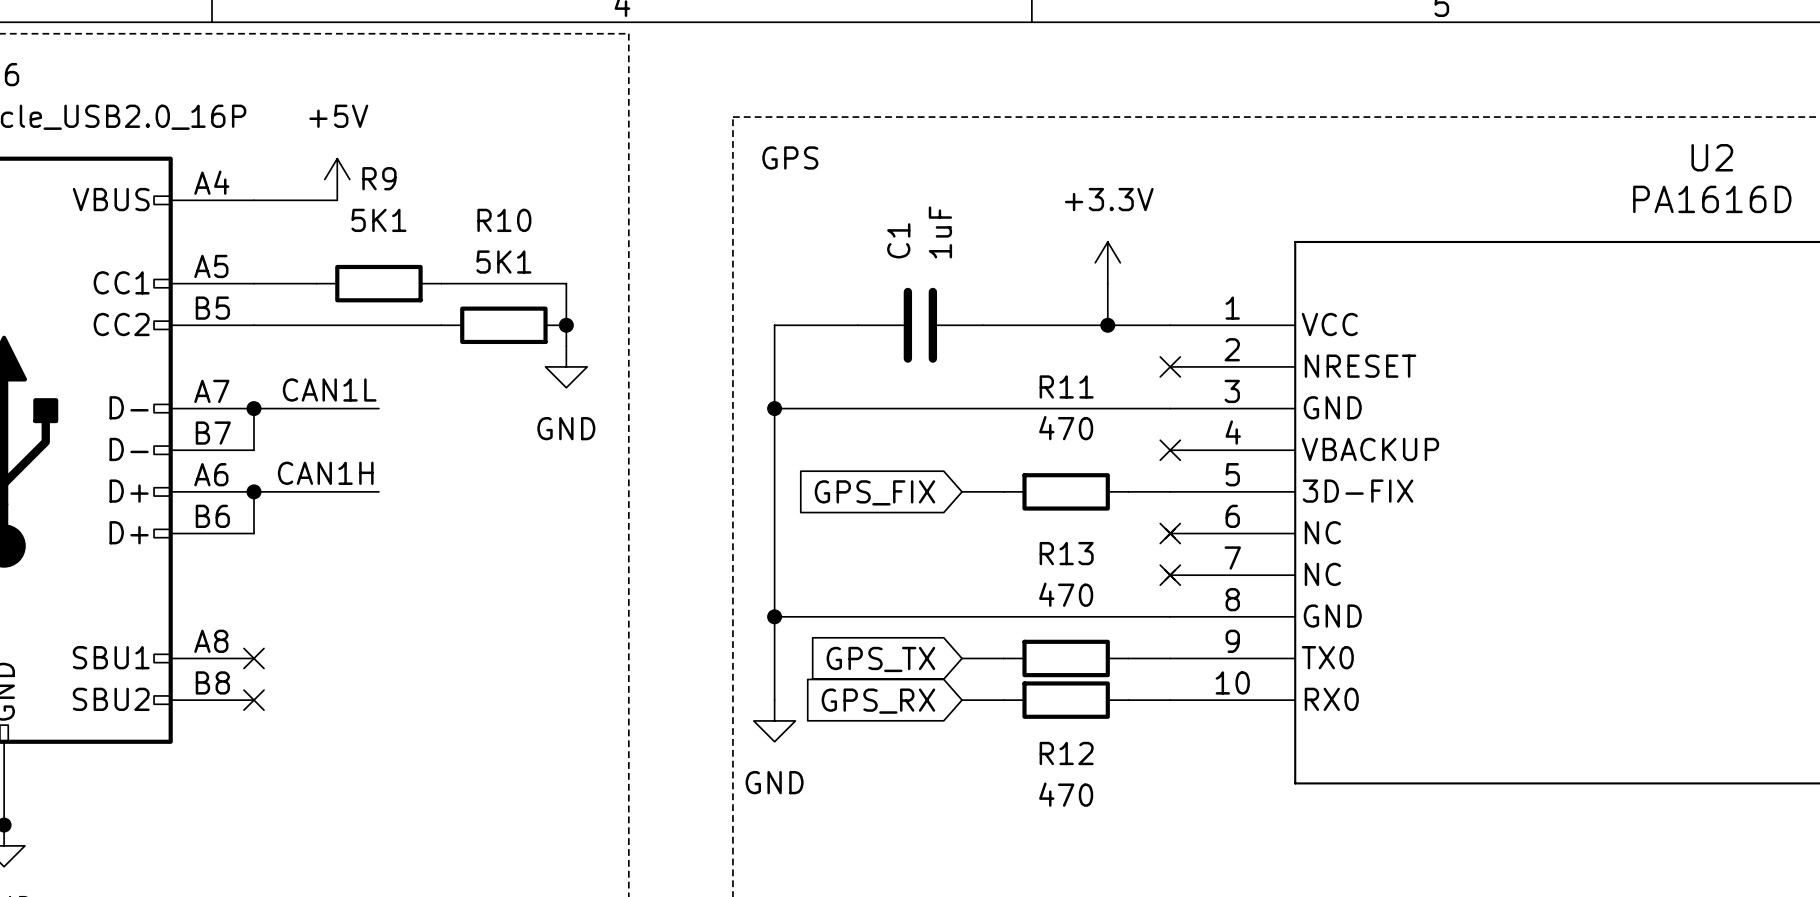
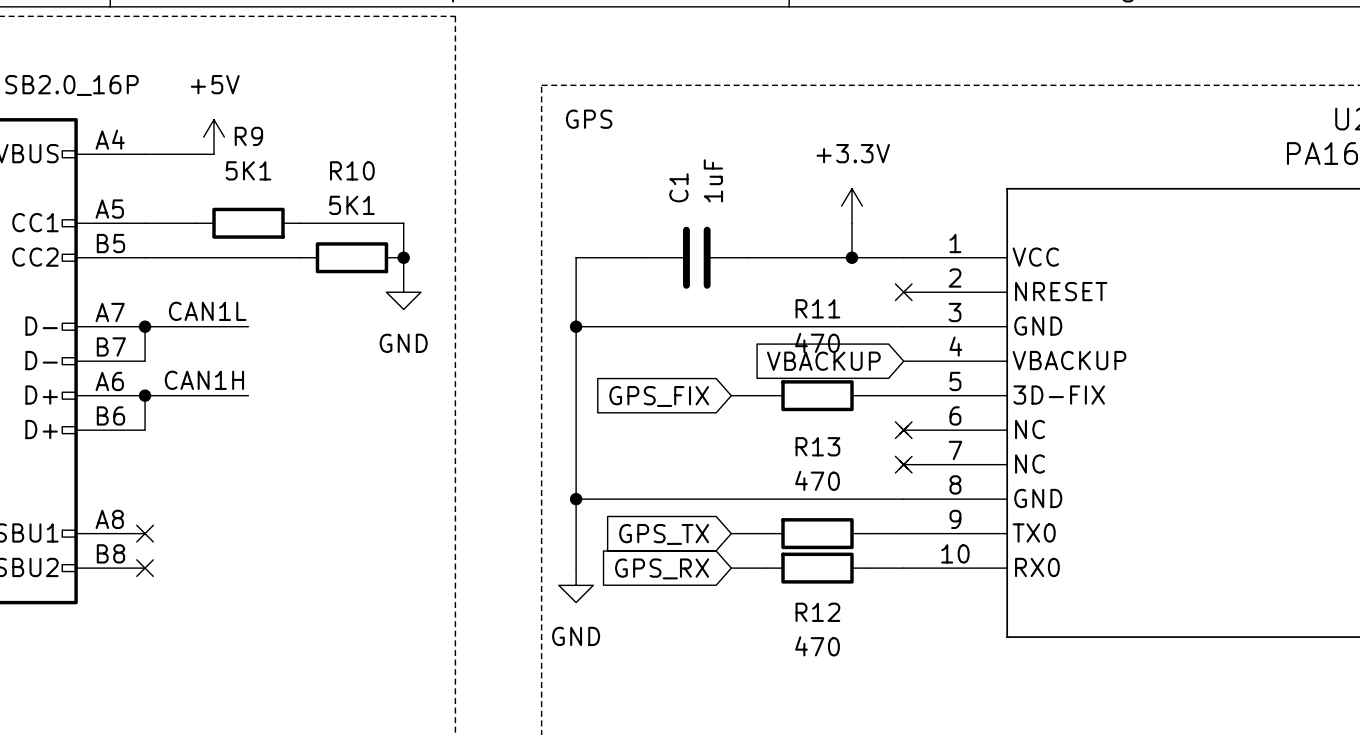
global label: none -> VBACKUP (823, 361)
no-connect mark: (1170, 450) -> none

